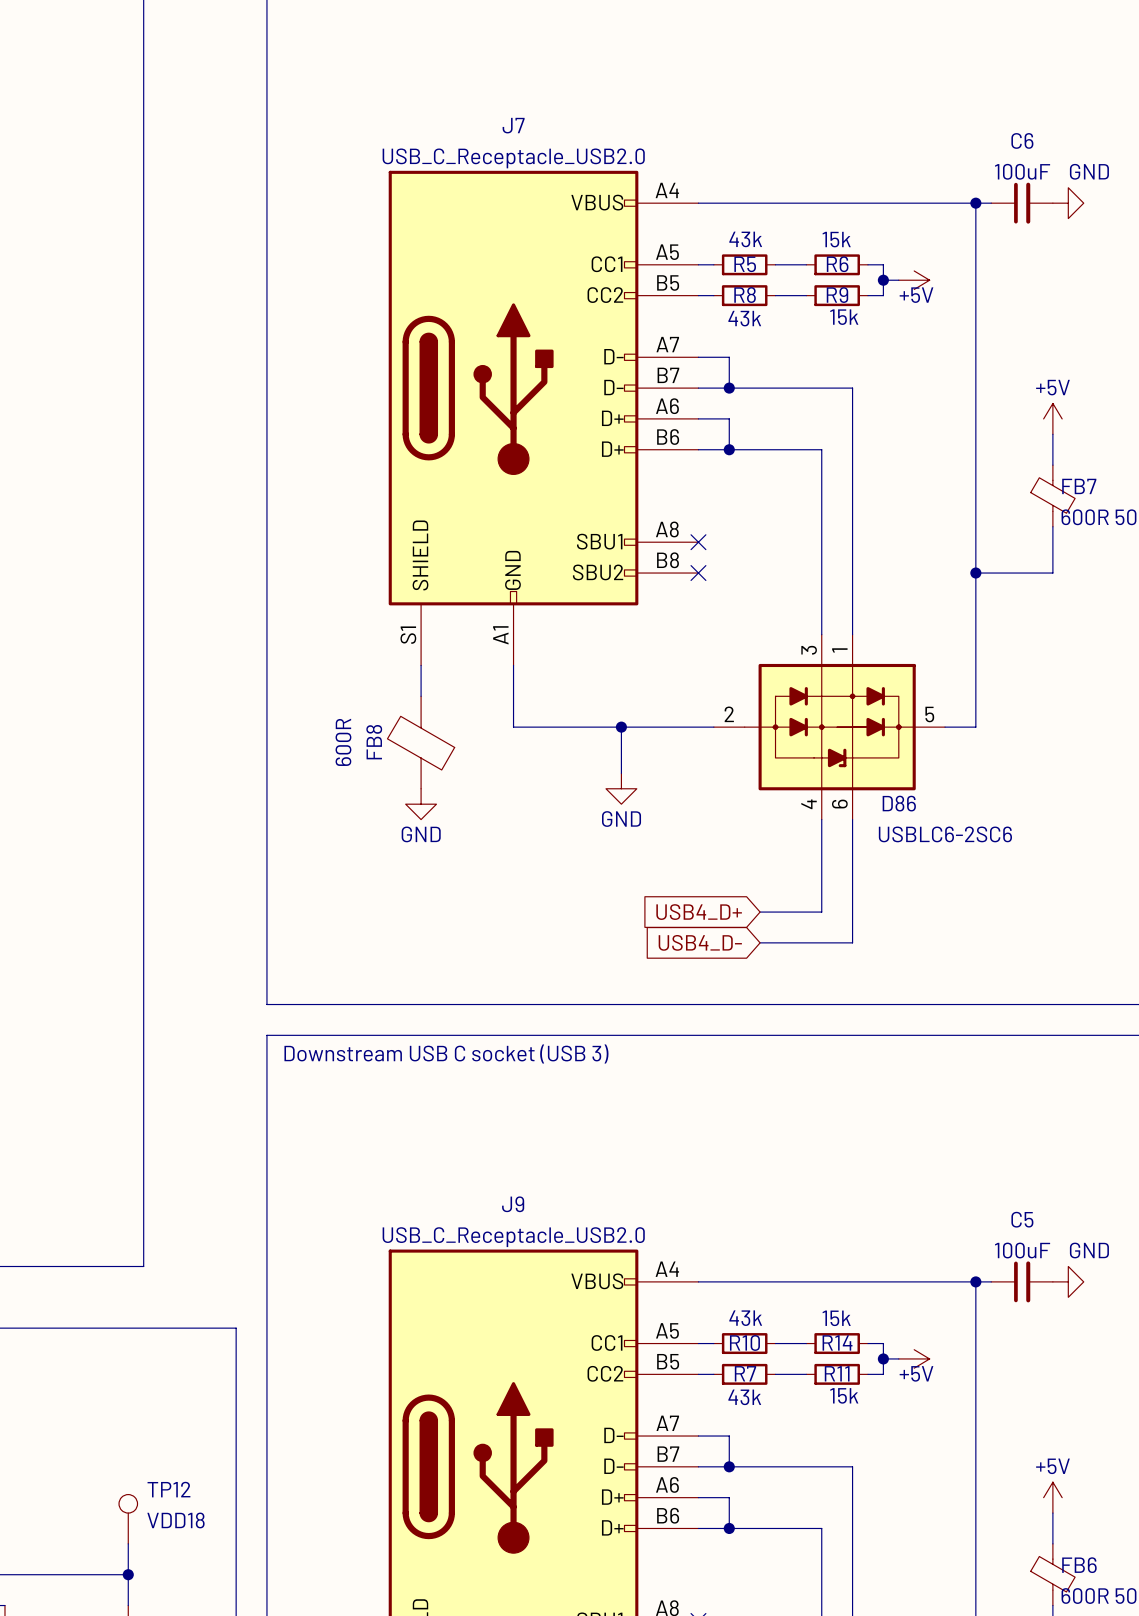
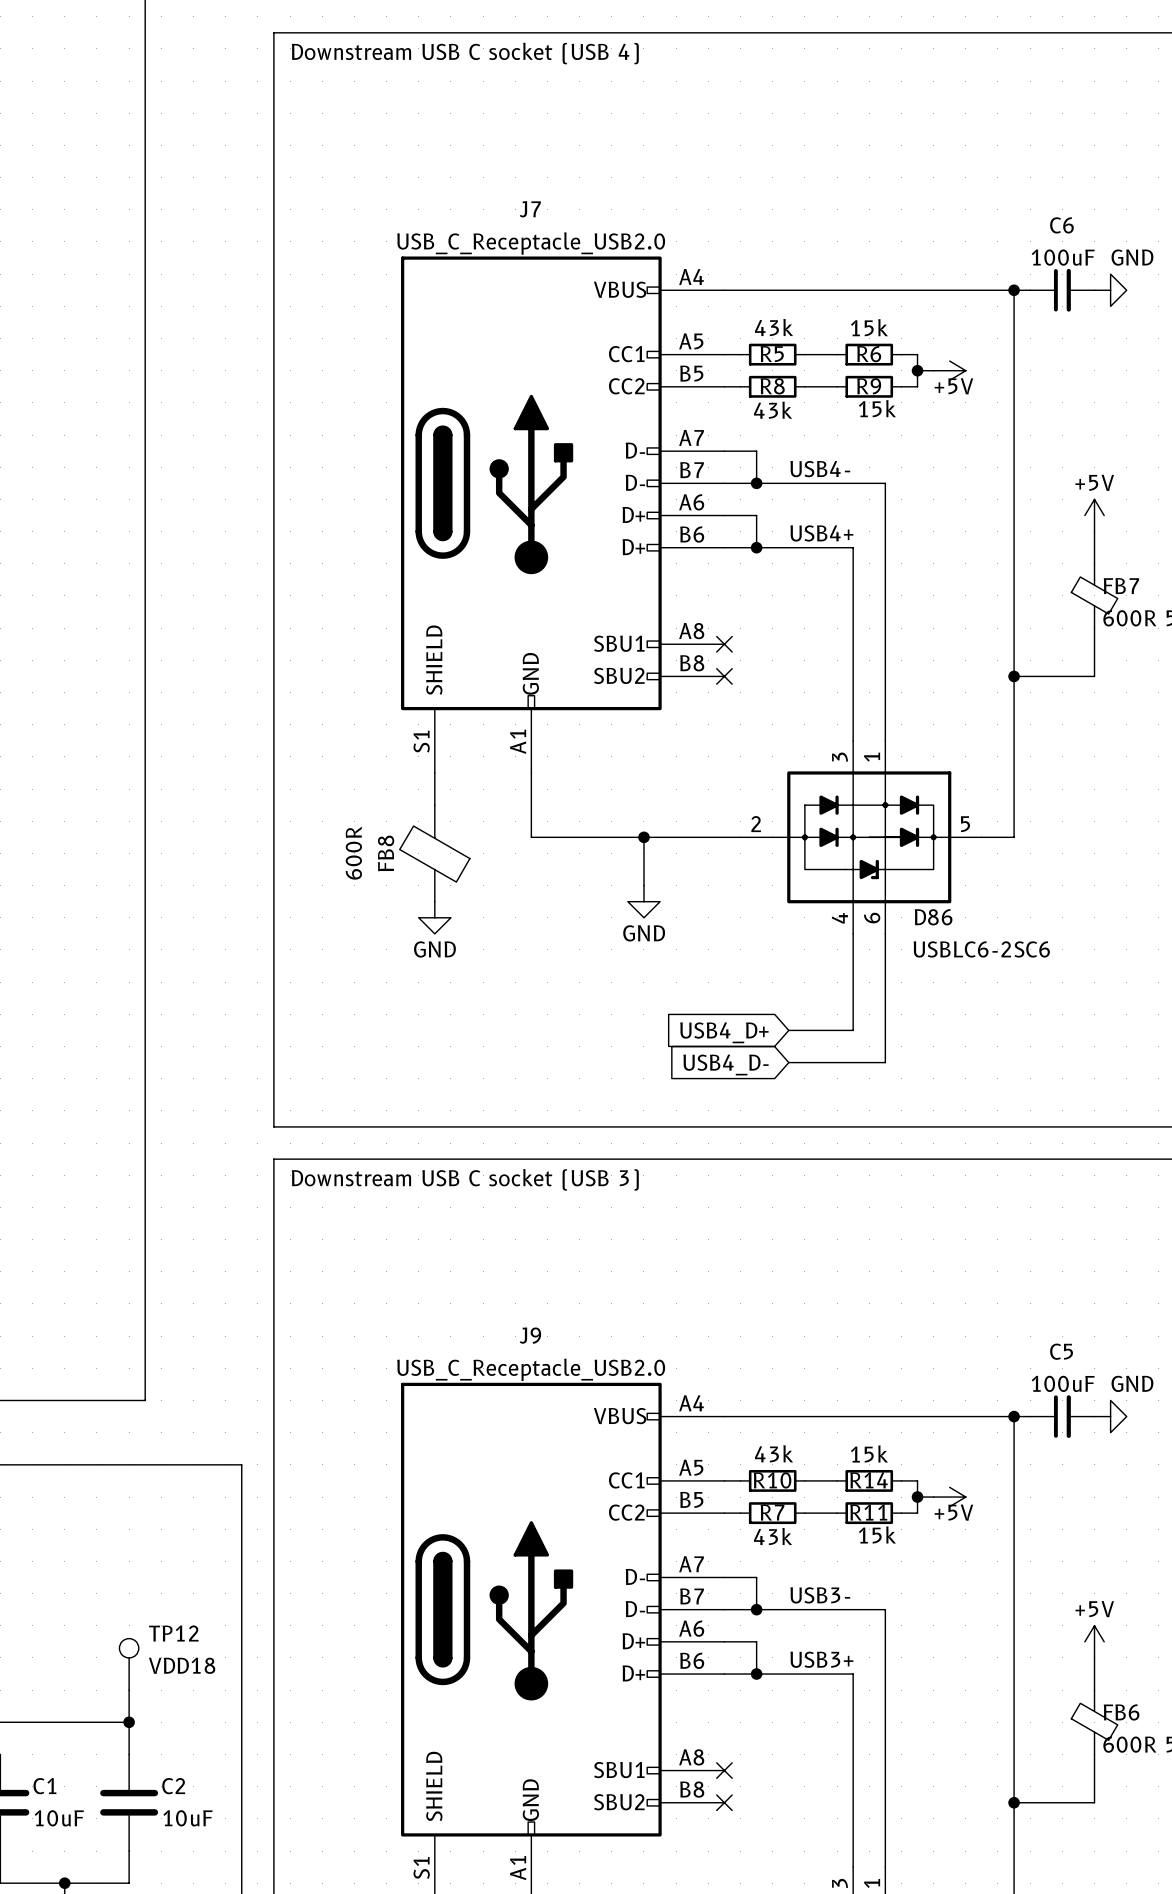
label: none -> USB4- (820, 469)
label: none -> USB4+ (821, 533)
label: none -> USB3- (820, 1595)
label: none -> USB3+ (821, 1659)

